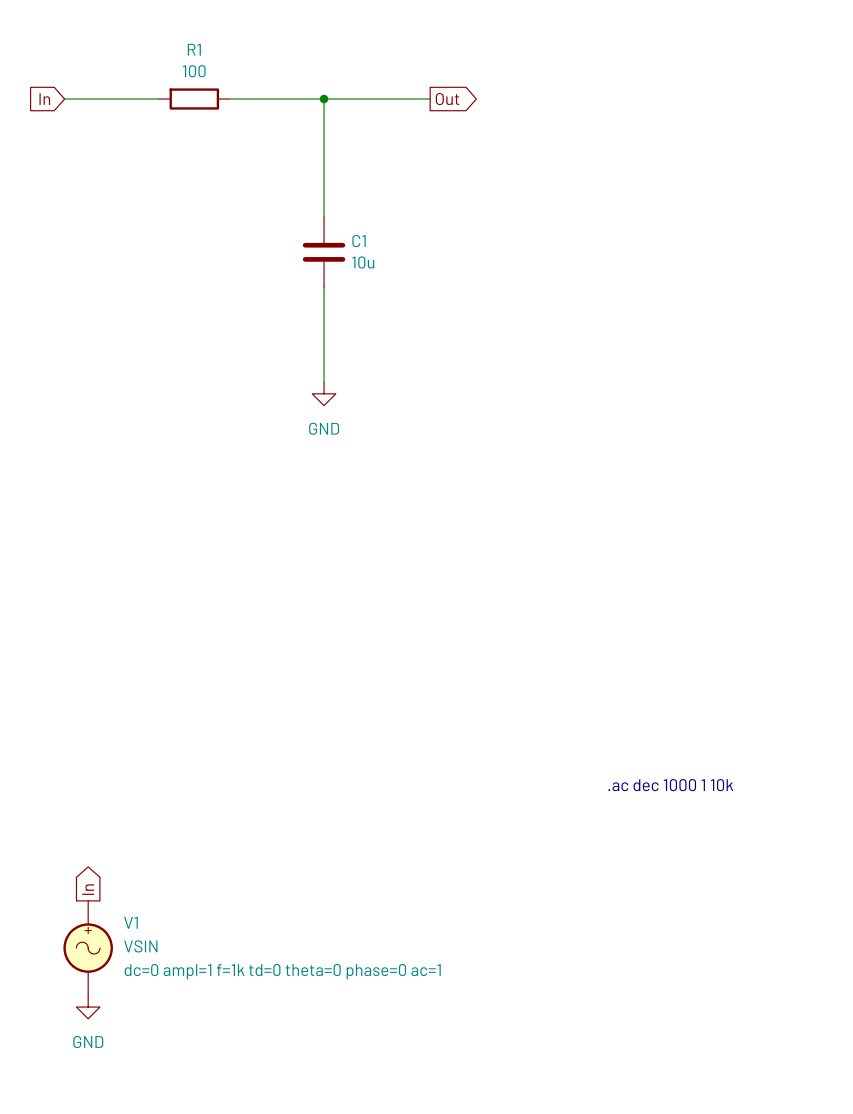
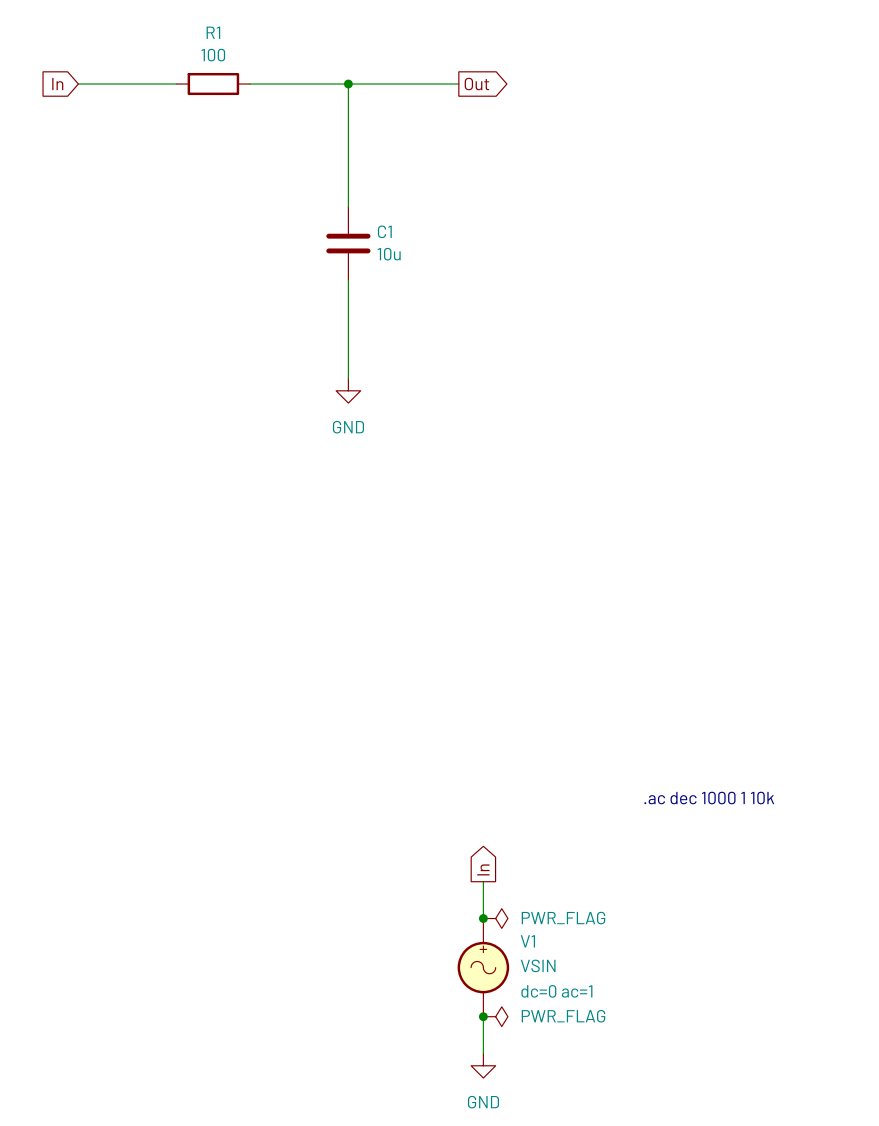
global label: none -> In (483, 869)
wire: none -> (483, 881) (483, 918)
global label: In (88, 889) -> none
junction: none -> (483, 918)
power symbol: none -> PWR_FLAG (495, 918)
V1 position: (88, 948) -> (483, 967)
V1 text: dc=0 ampl=1 f=1k td=0 theta=0 phase=0 ac=1 (282, 971) -> dc=0 ac=1 (556, 991)
wire: none -> (483, 1016) (483, 1053)
junction: none -> (483, 1016)
power symbol: none -> PWR_FLAG (495, 1016)
power symbol: GND (88, 1007) -> none
power symbol: none -> GND (483, 1065)

